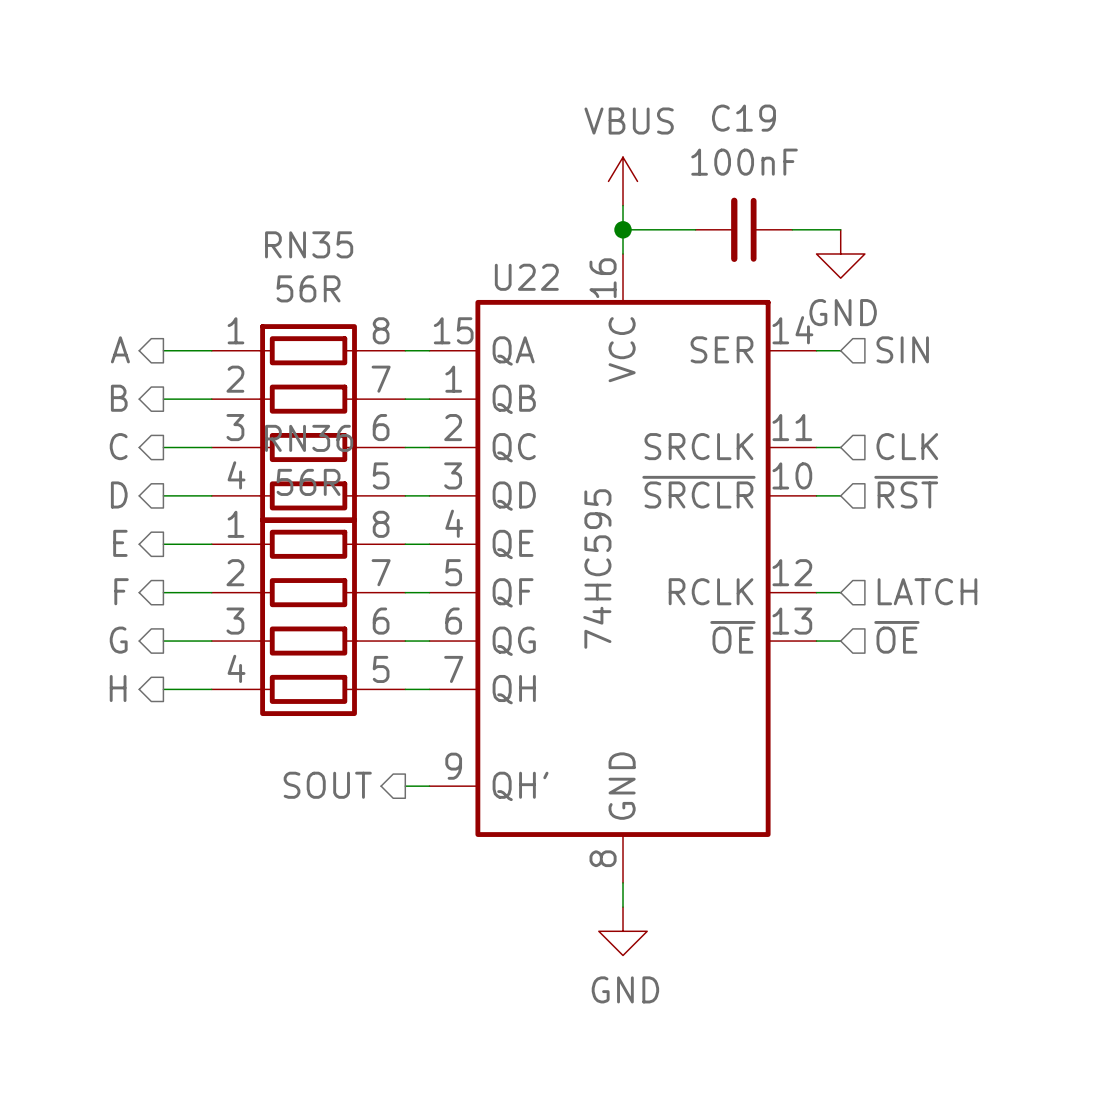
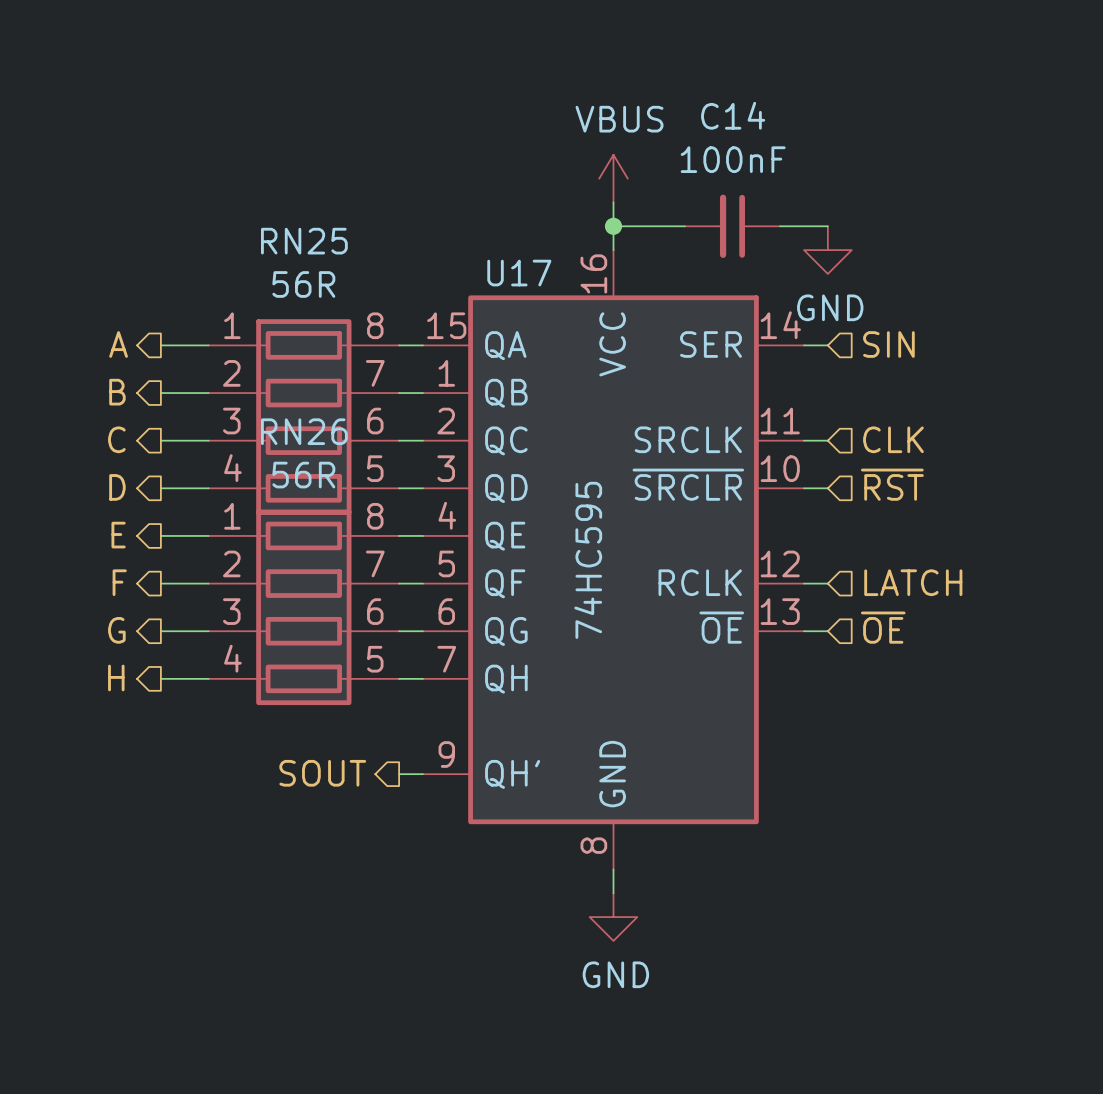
C19 name: C19 (743, 118) -> C14 (733, 115)
RN35 name: RN35 (309, 244) -> RN25 (304, 241)
U22 name: U22 (526, 277) -> U17 (519, 273)
RN36 name: RN36 (309, 438) -> RN26 (304, 431)

